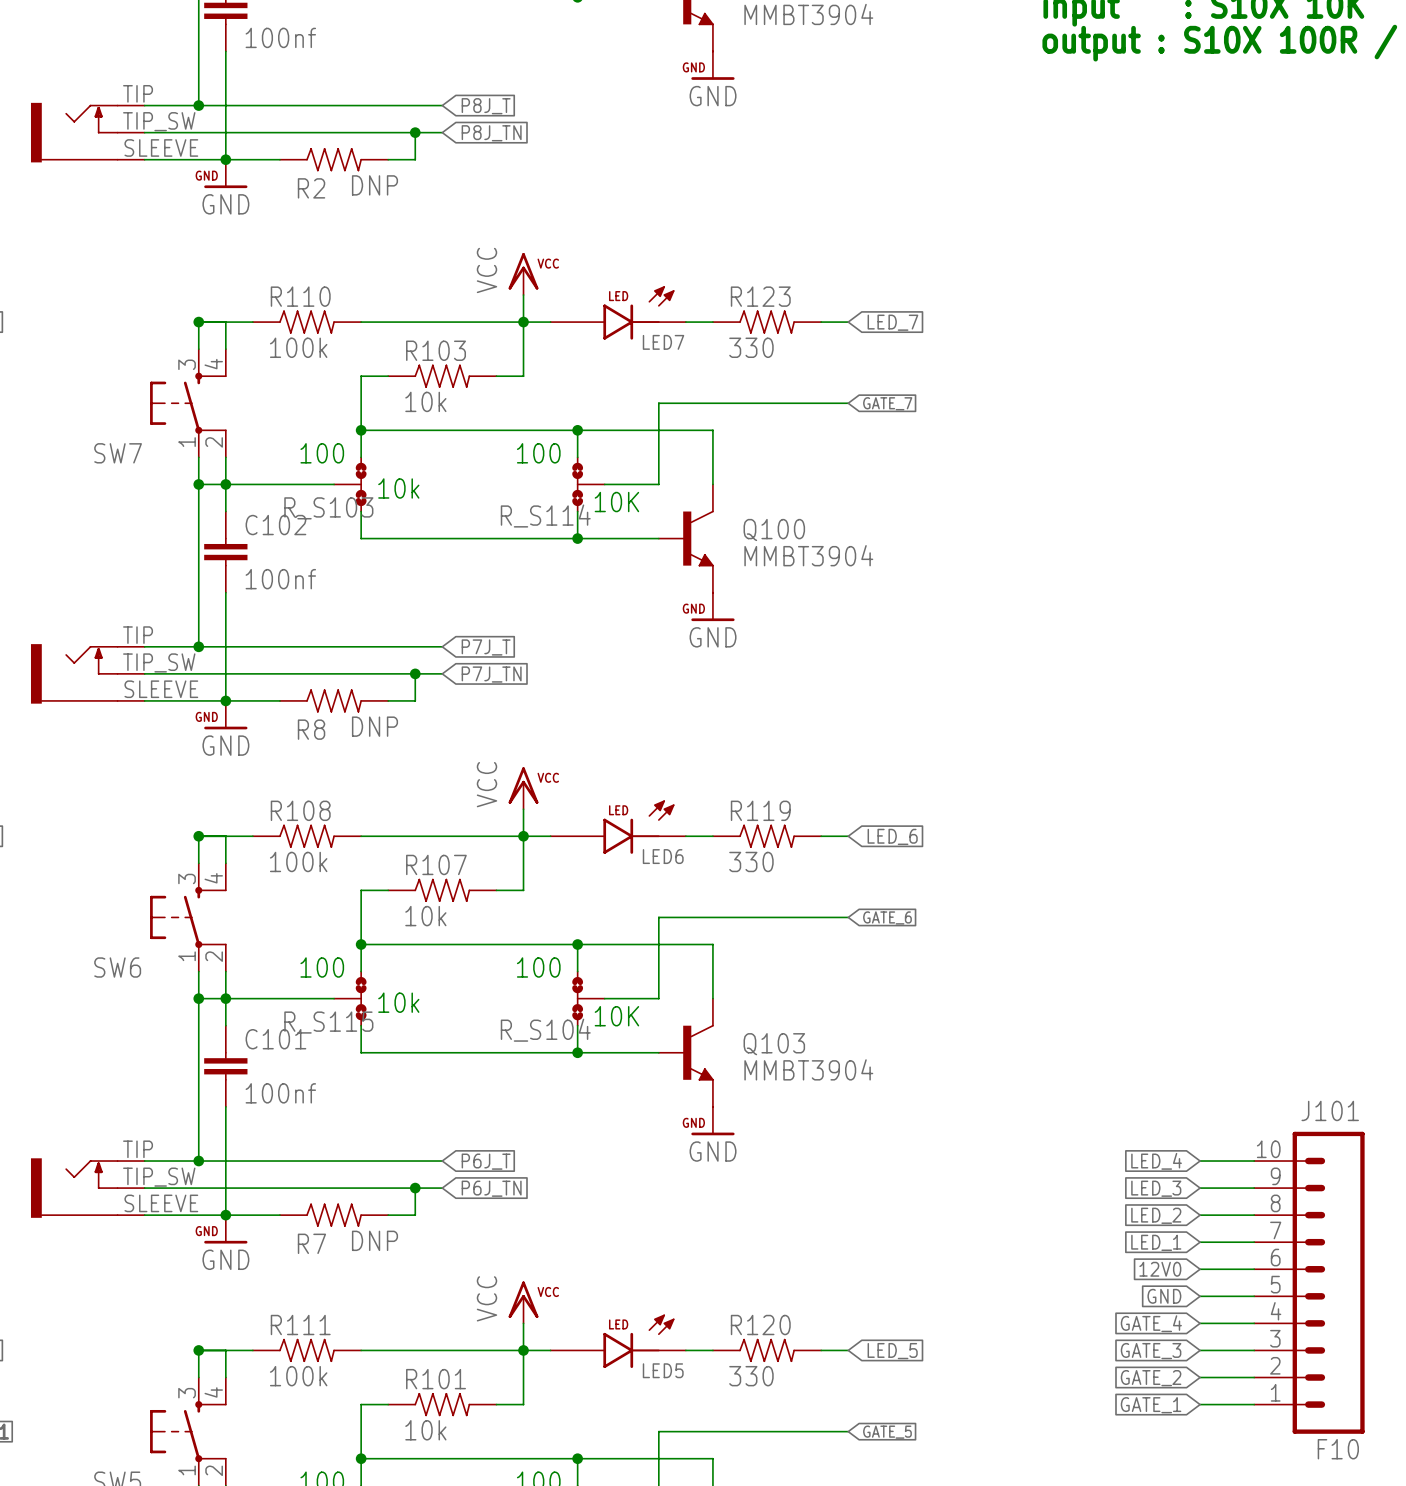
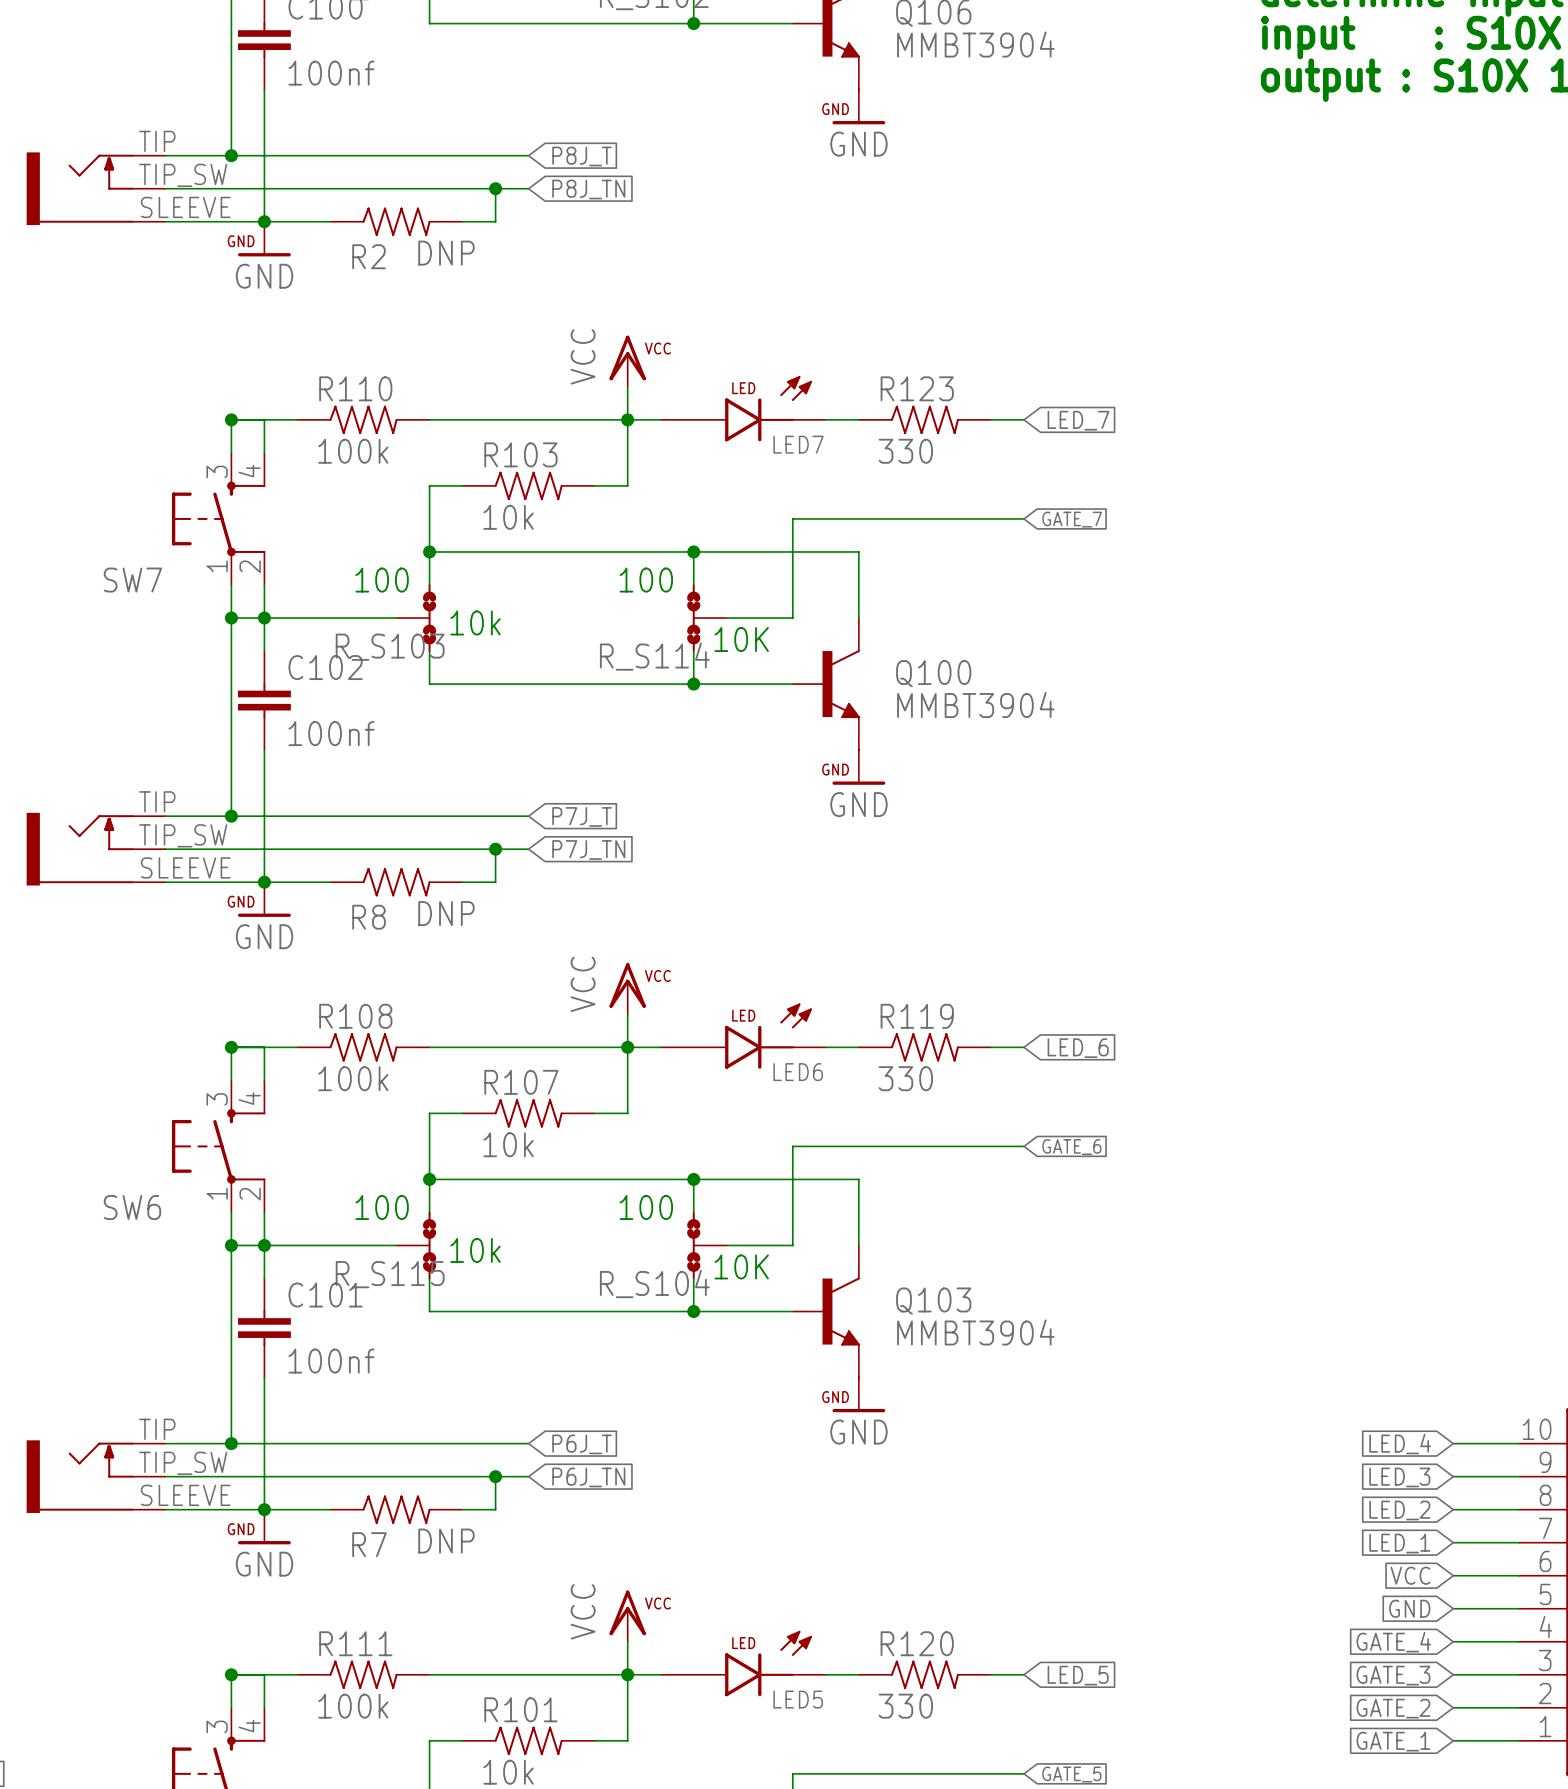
global label: 12V0 (1160, 1269) -> VCC (1410, 1575)

